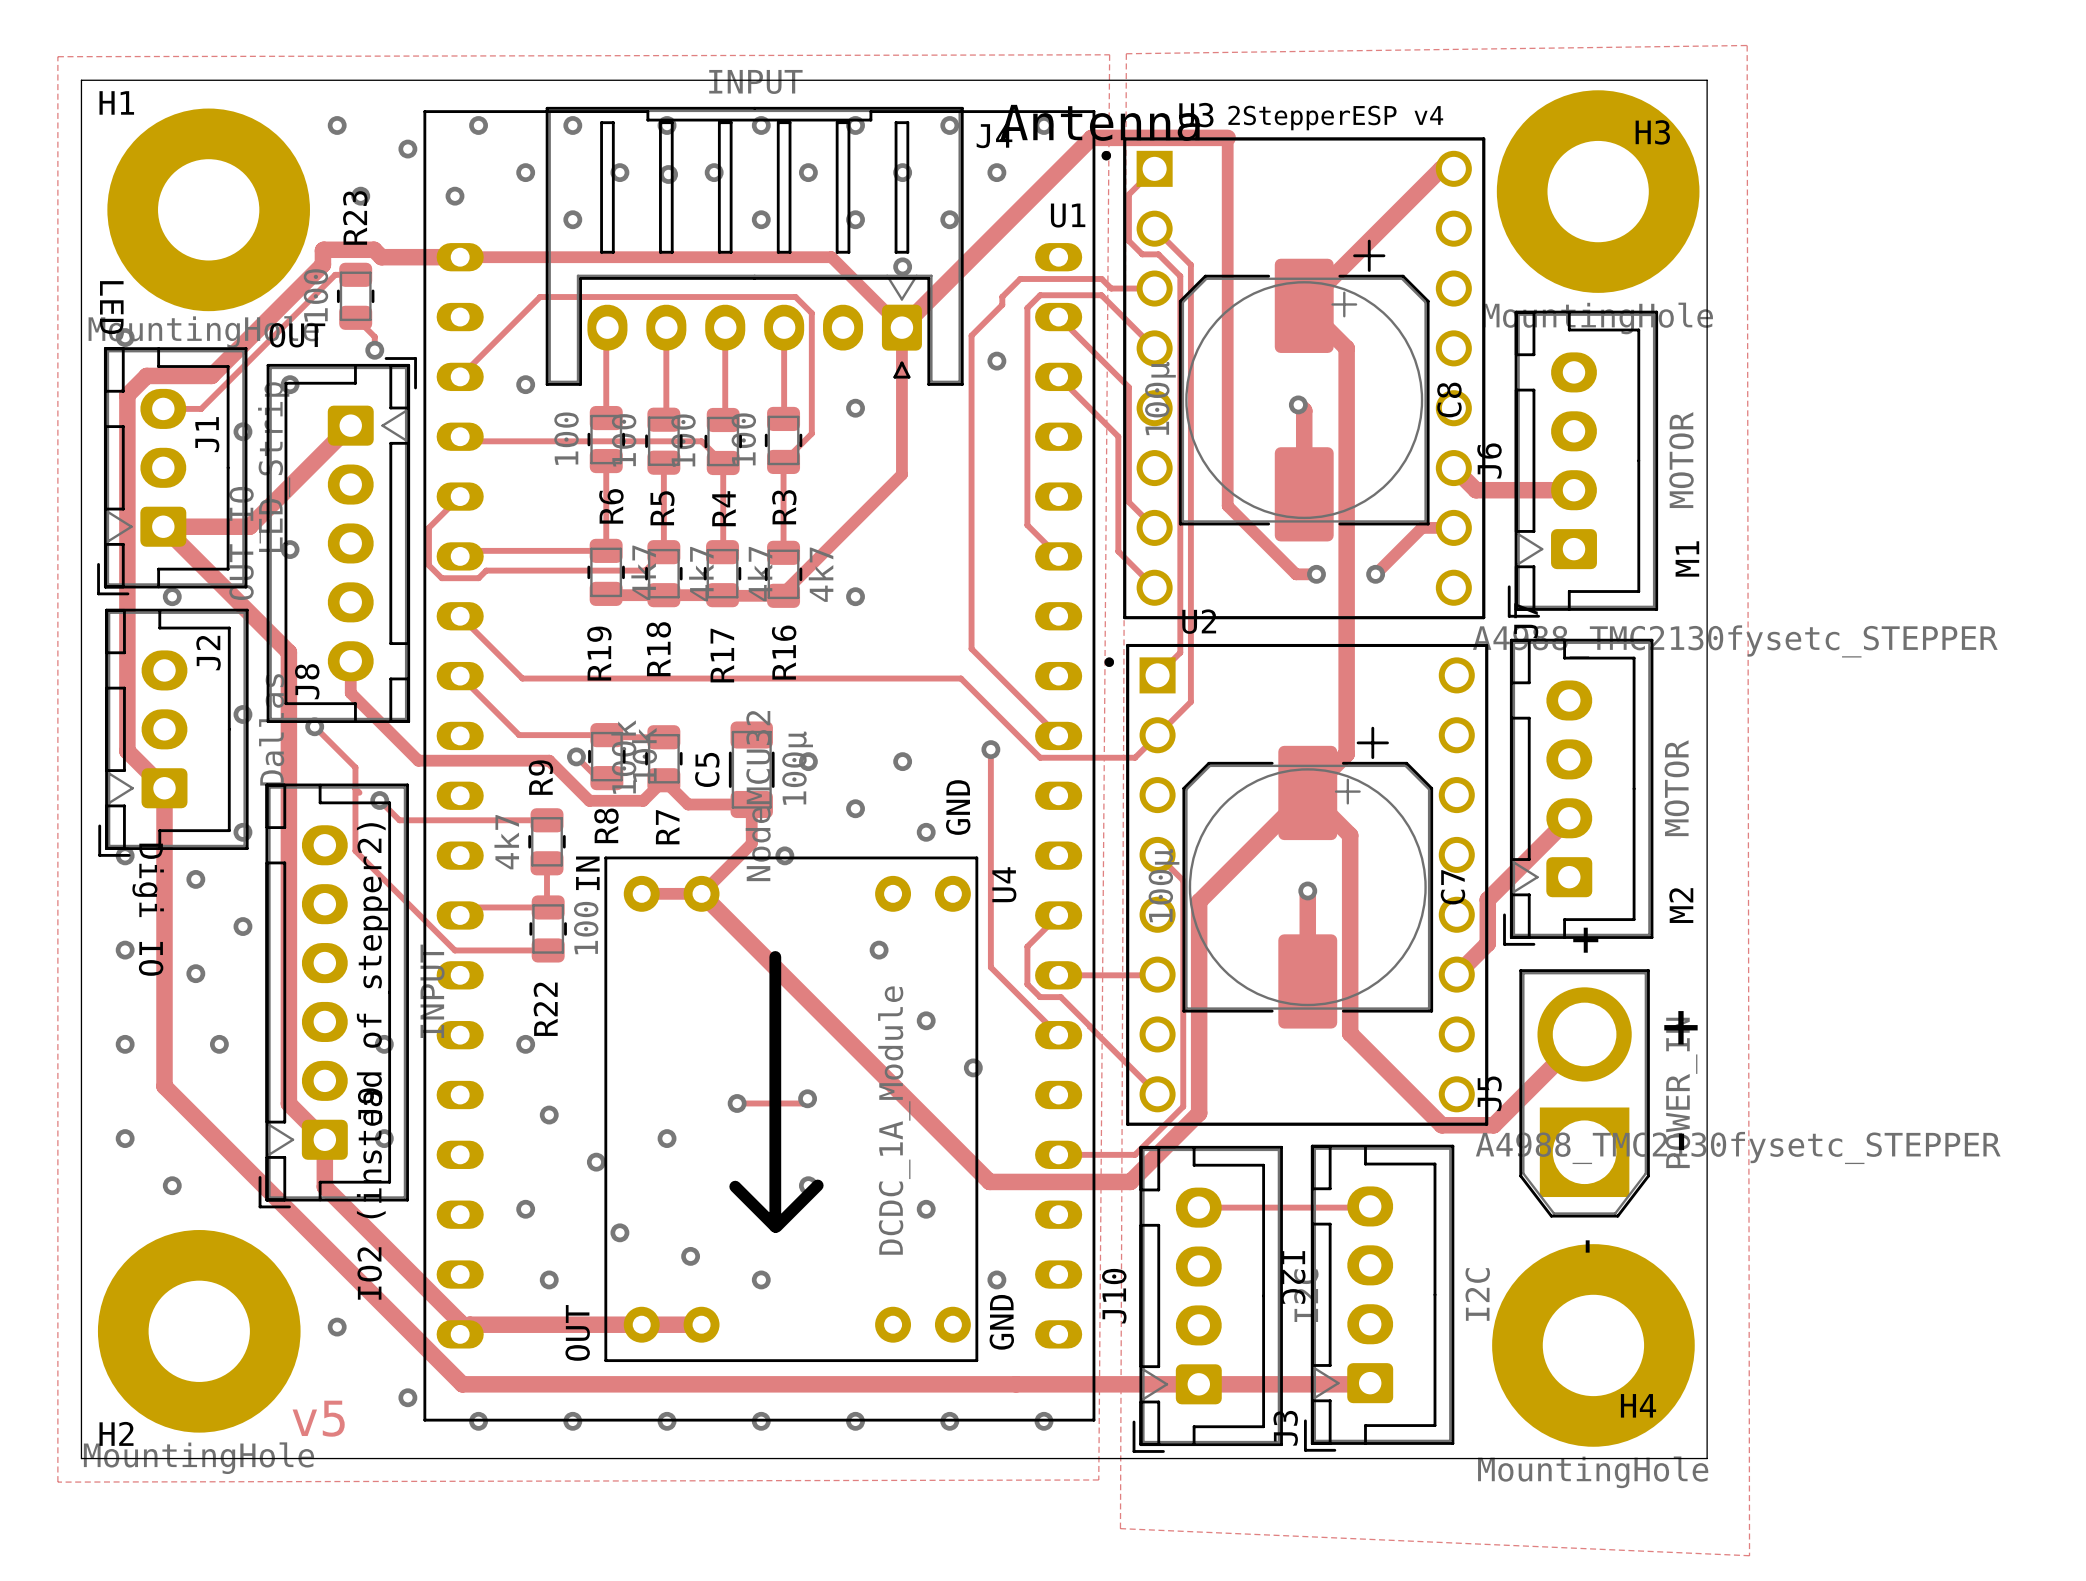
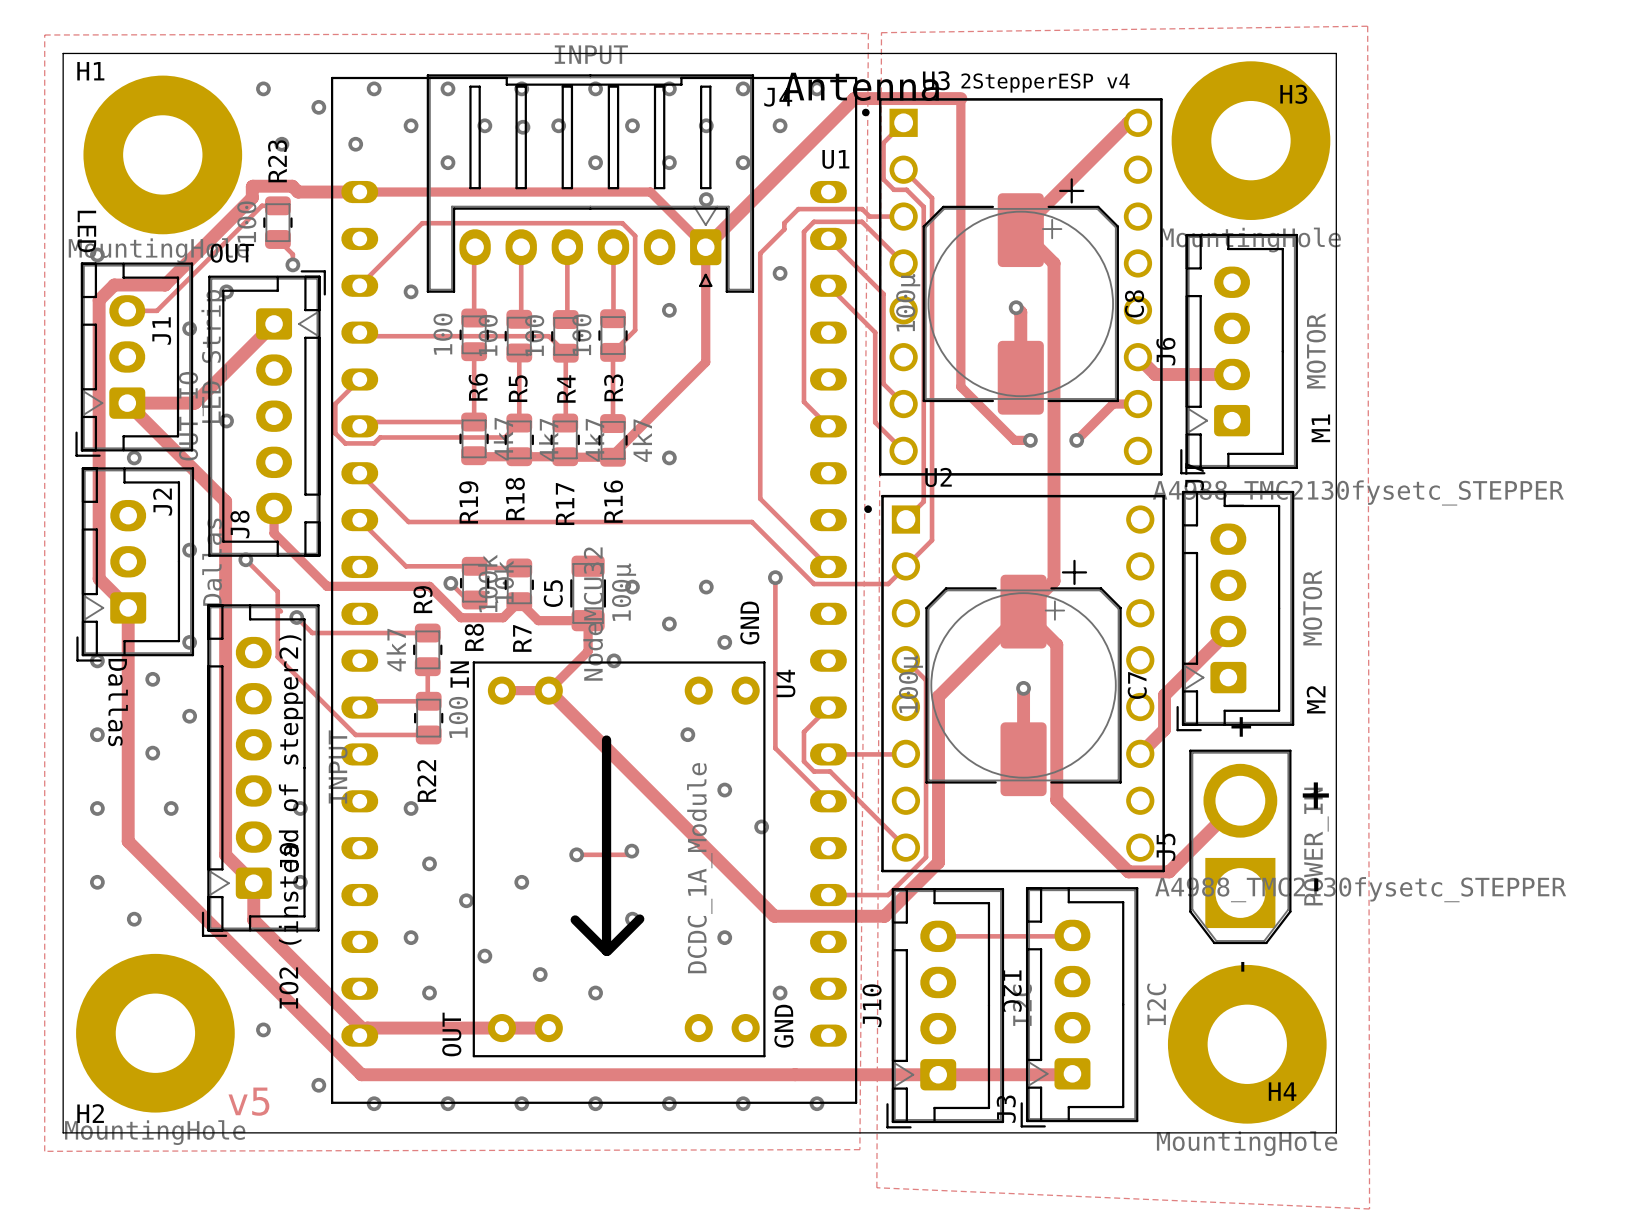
text: Digi IO (148, 909) -> Dallas (118, 702)

